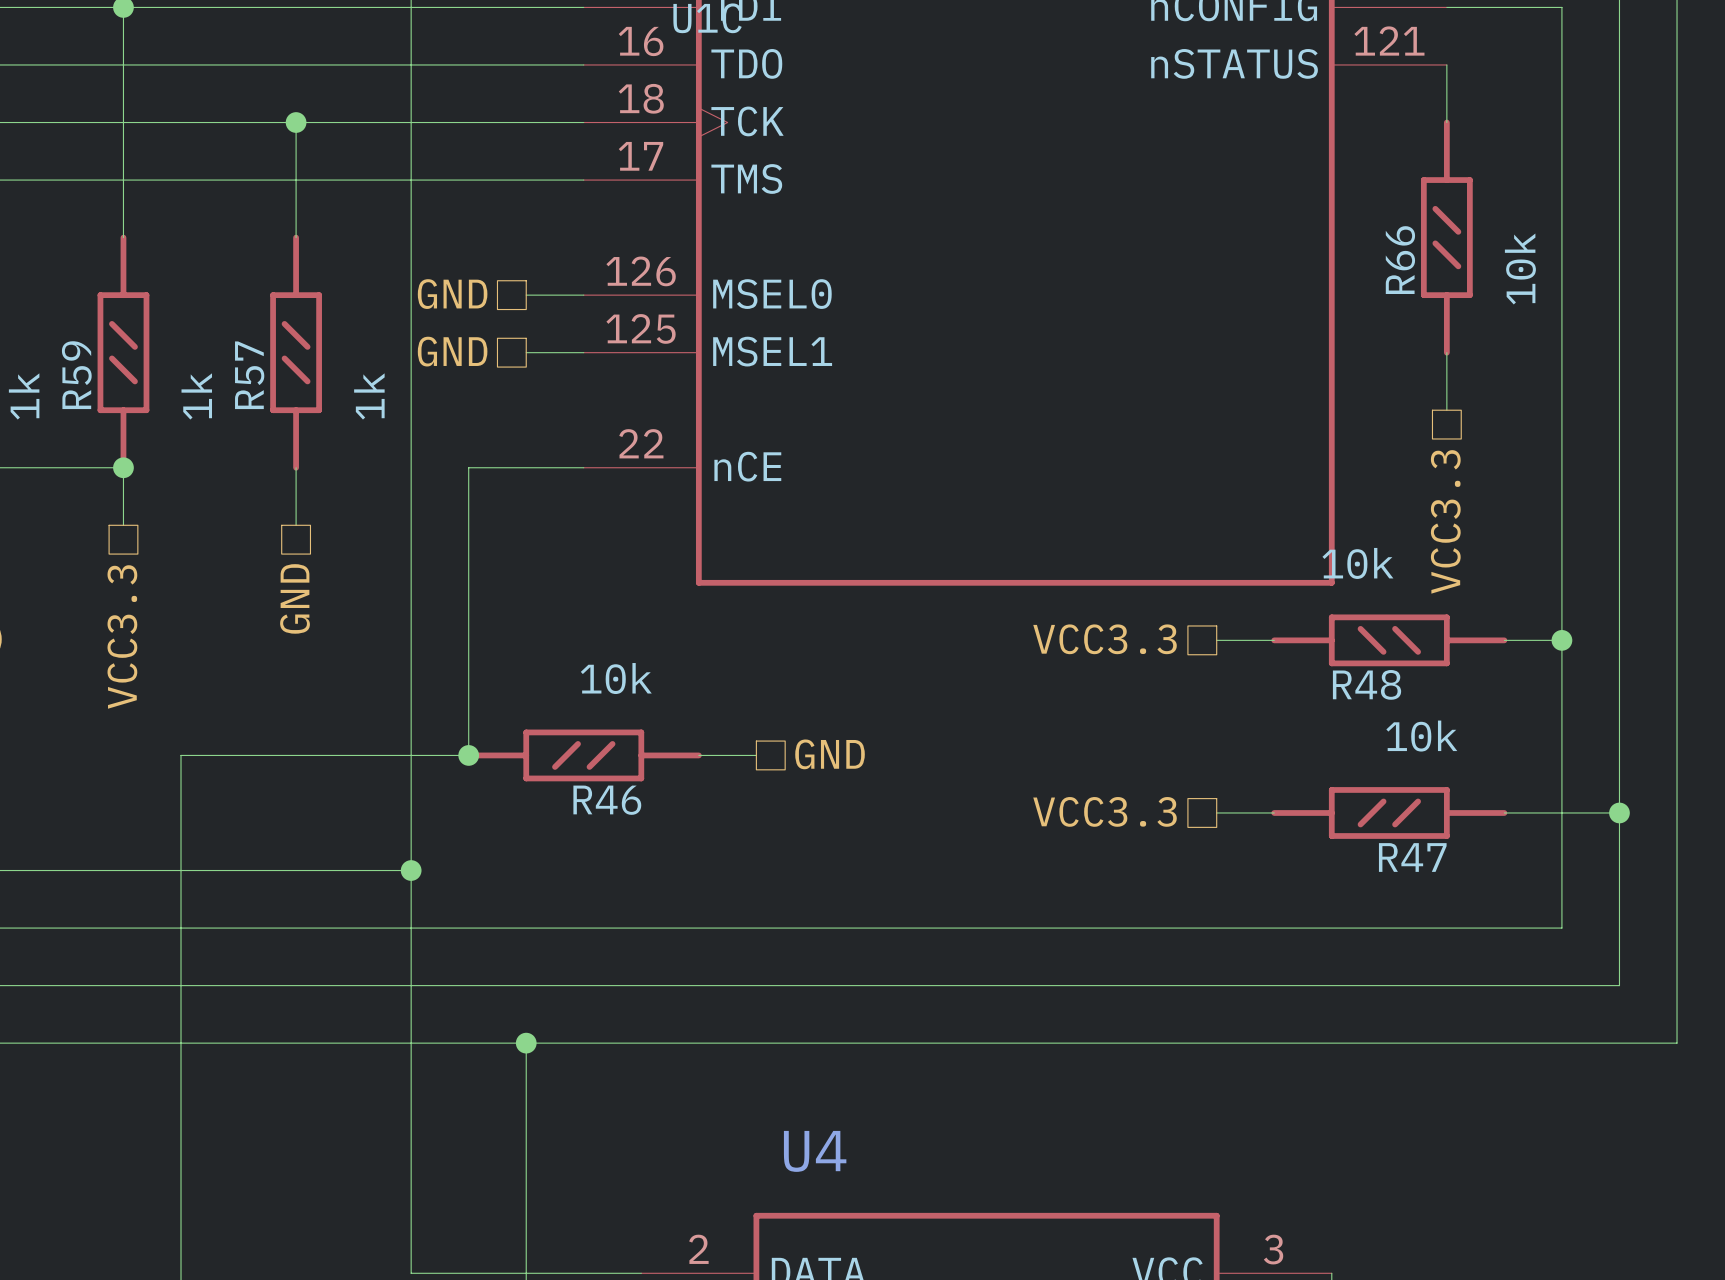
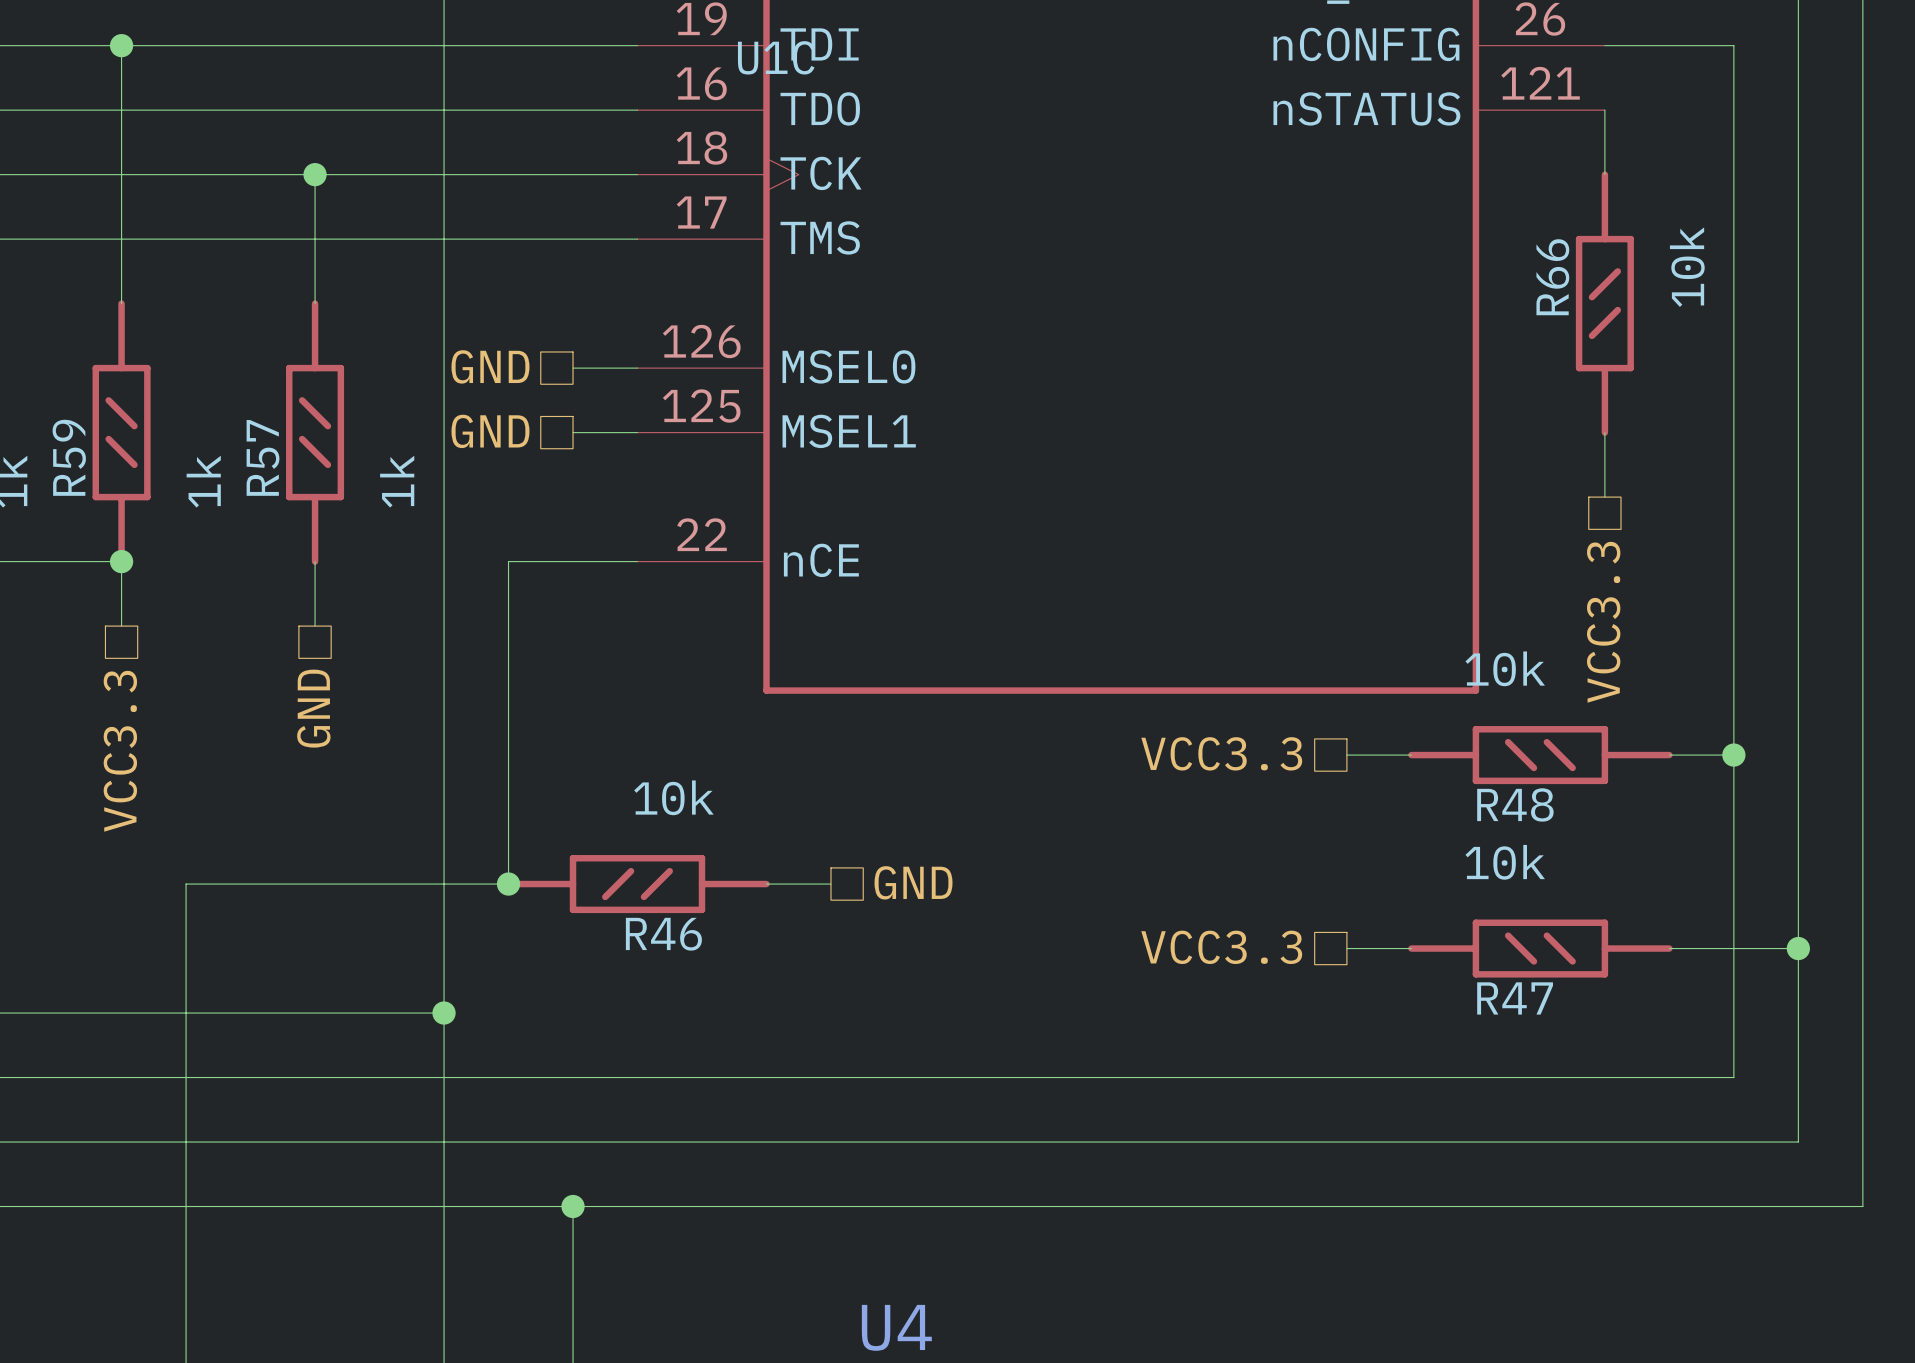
R66 flip: as is (1446, 237) -> left-right (1604, 303)
R66 name position: R66 (1400, 260) -> R66 (1552, 277)
R47 flip: as is (1389, 812) -> left-right (1540, 948)

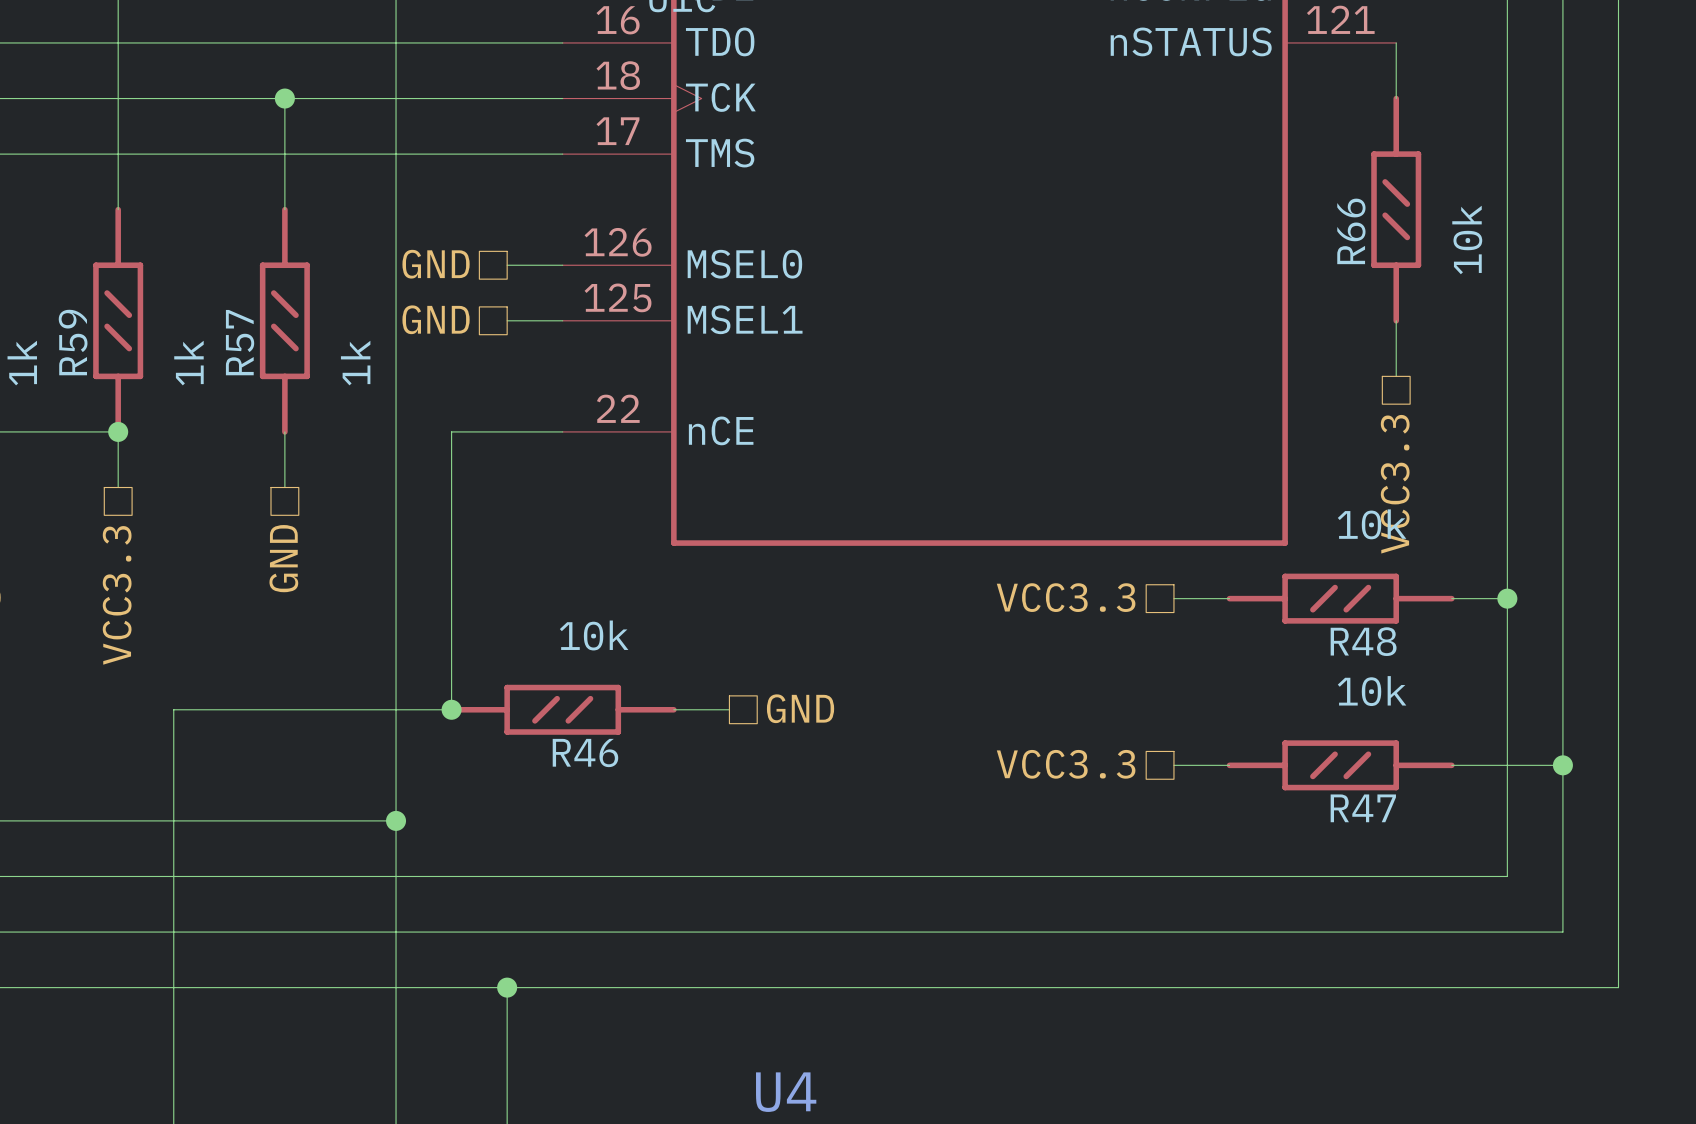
R66 name position: R66 (1552, 277) -> R66 (1351, 231)
R66 flip: as is (1604, 303) -> left-right (1396, 209)
R48 flip: as is (1540, 755) -> left-right (1340, 598)
R47 flip: as is (1540, 948) -> left-right (1340, 765)

